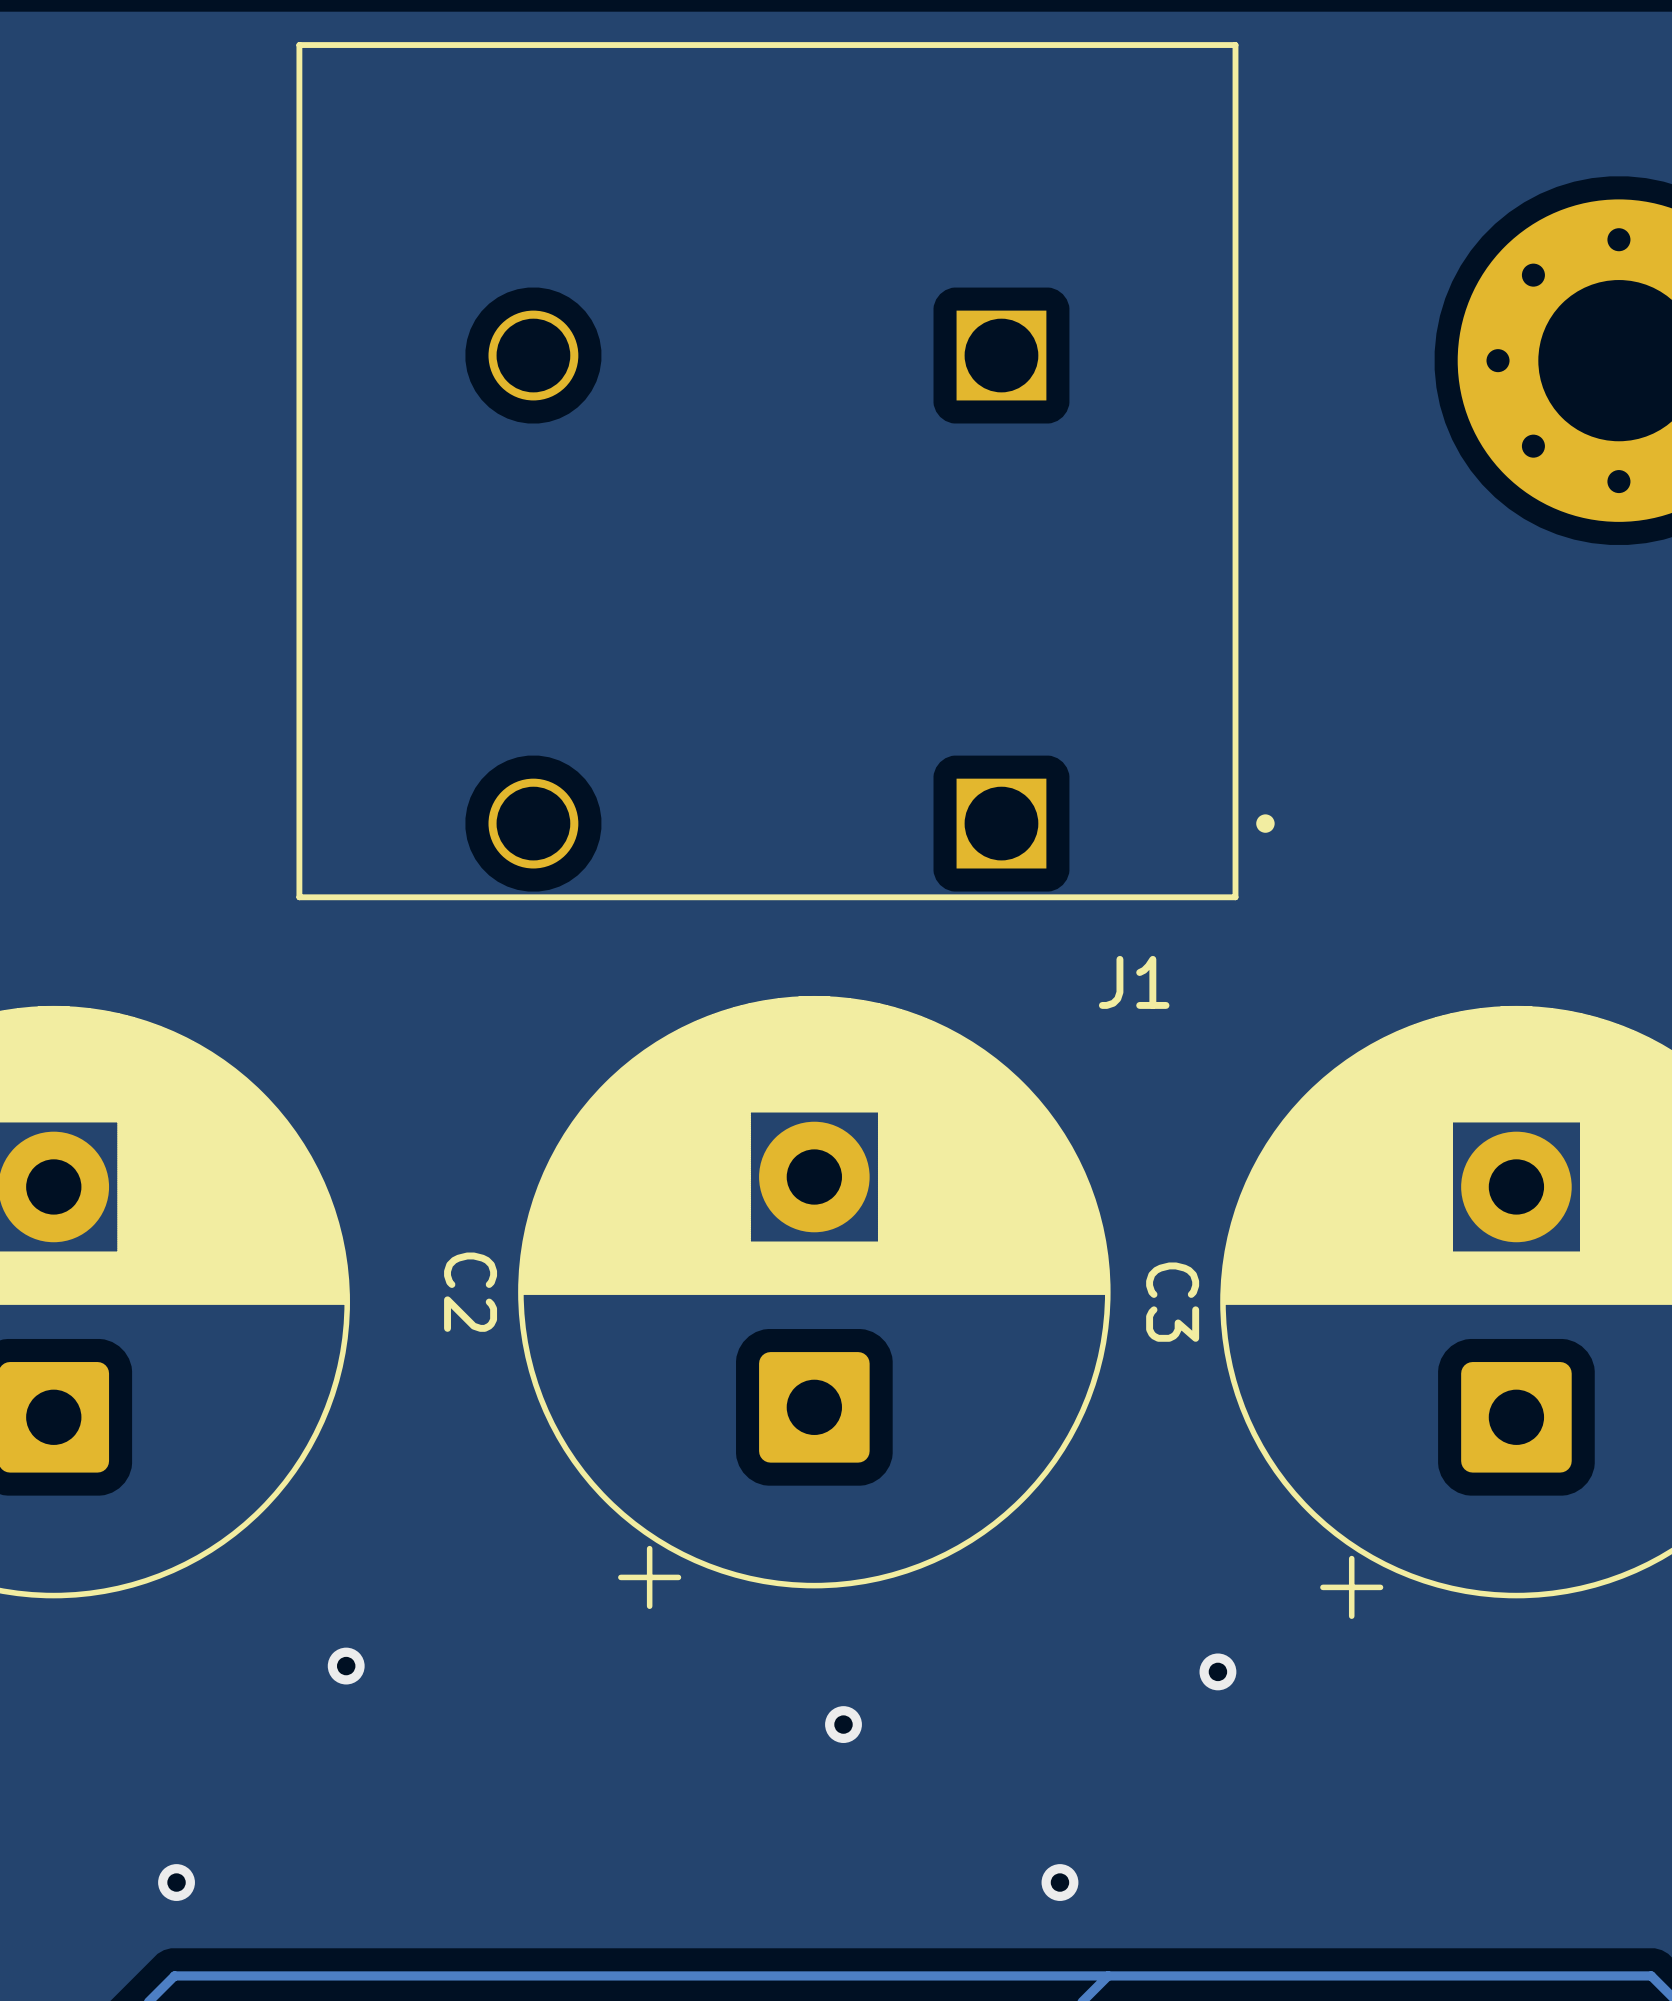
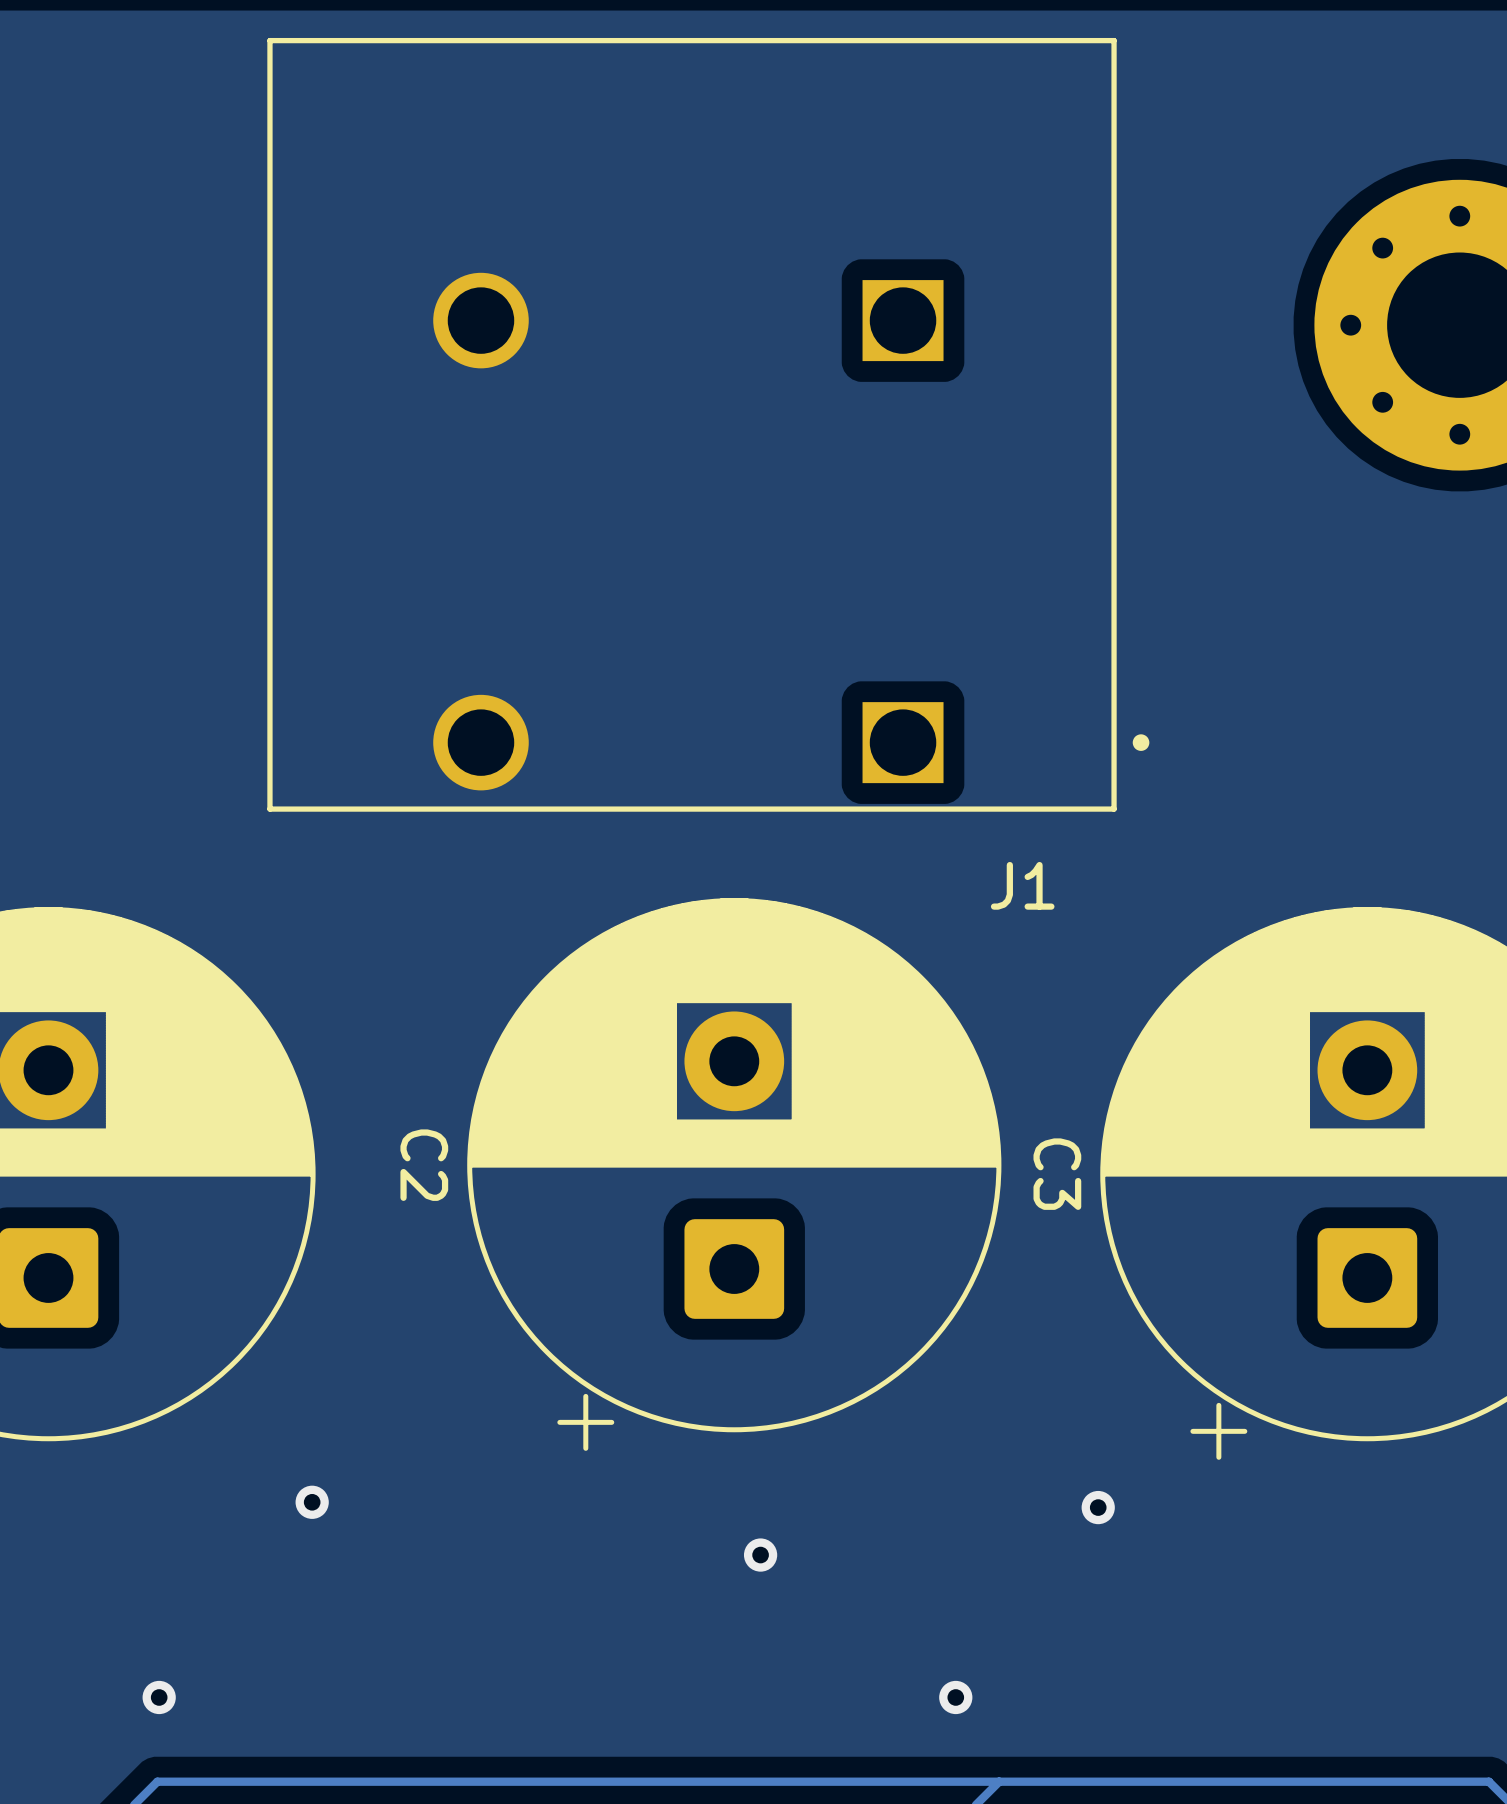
J1 footprint: [296, 42, 1275, 901] -> [267, 37, 1150, 812]

